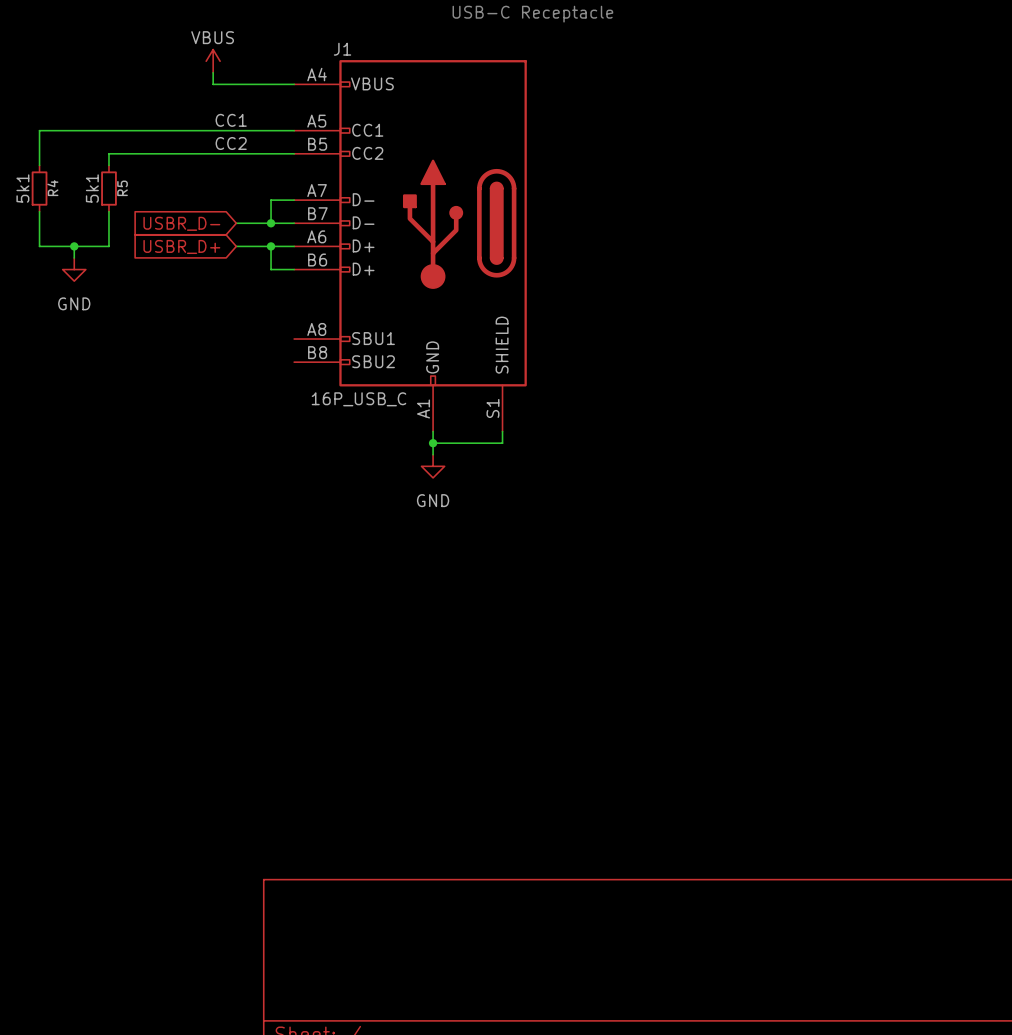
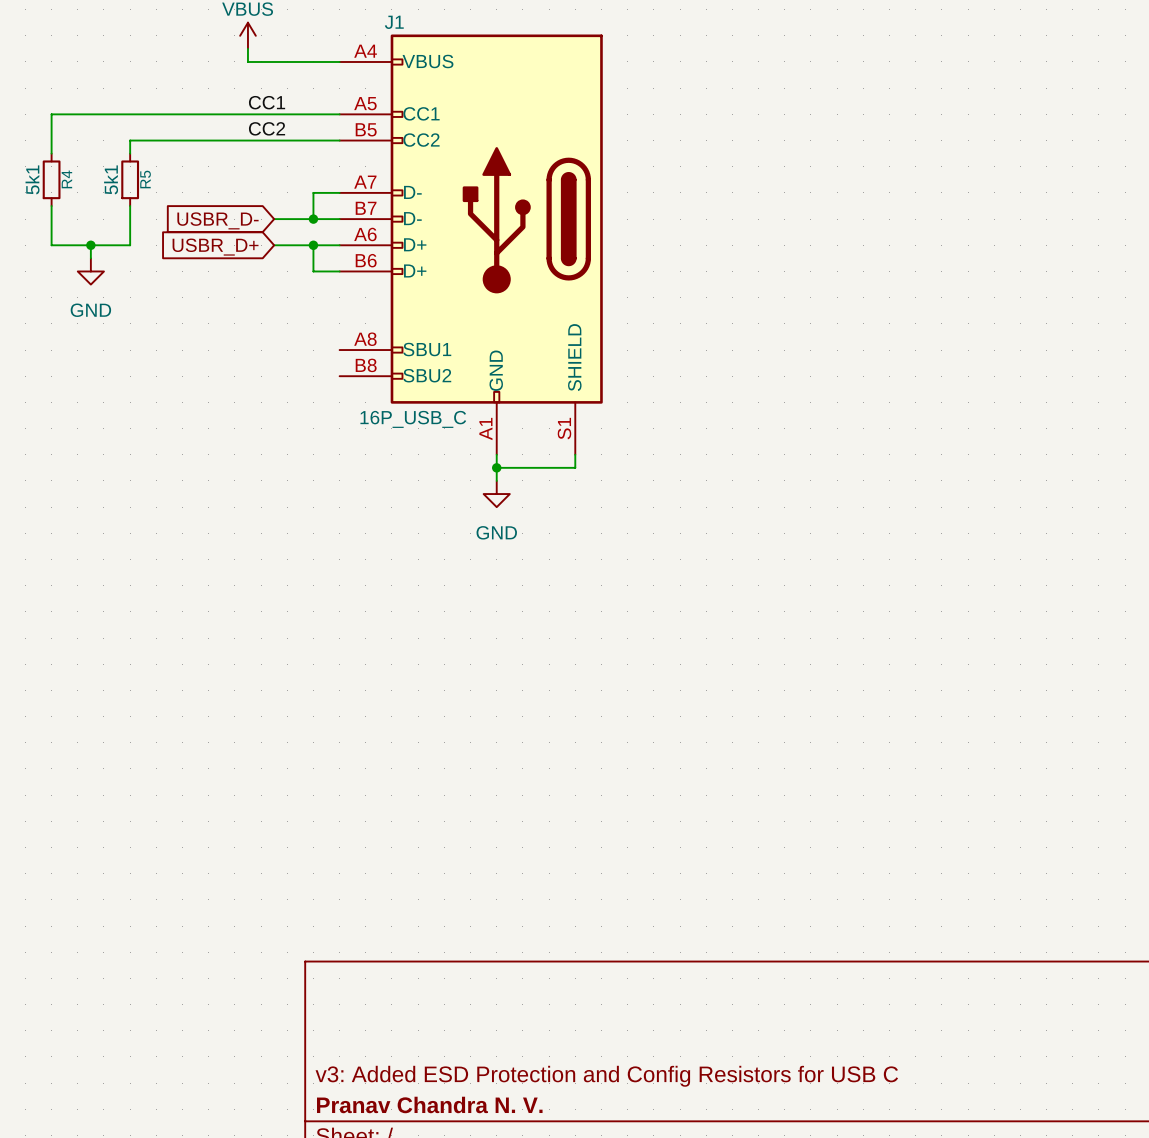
title block: none -> v3: Added ESD Protection and Config Resistors for USB C (606, 1076)
title block: none -> Pranav Chandra N. V. (429, 1104)

